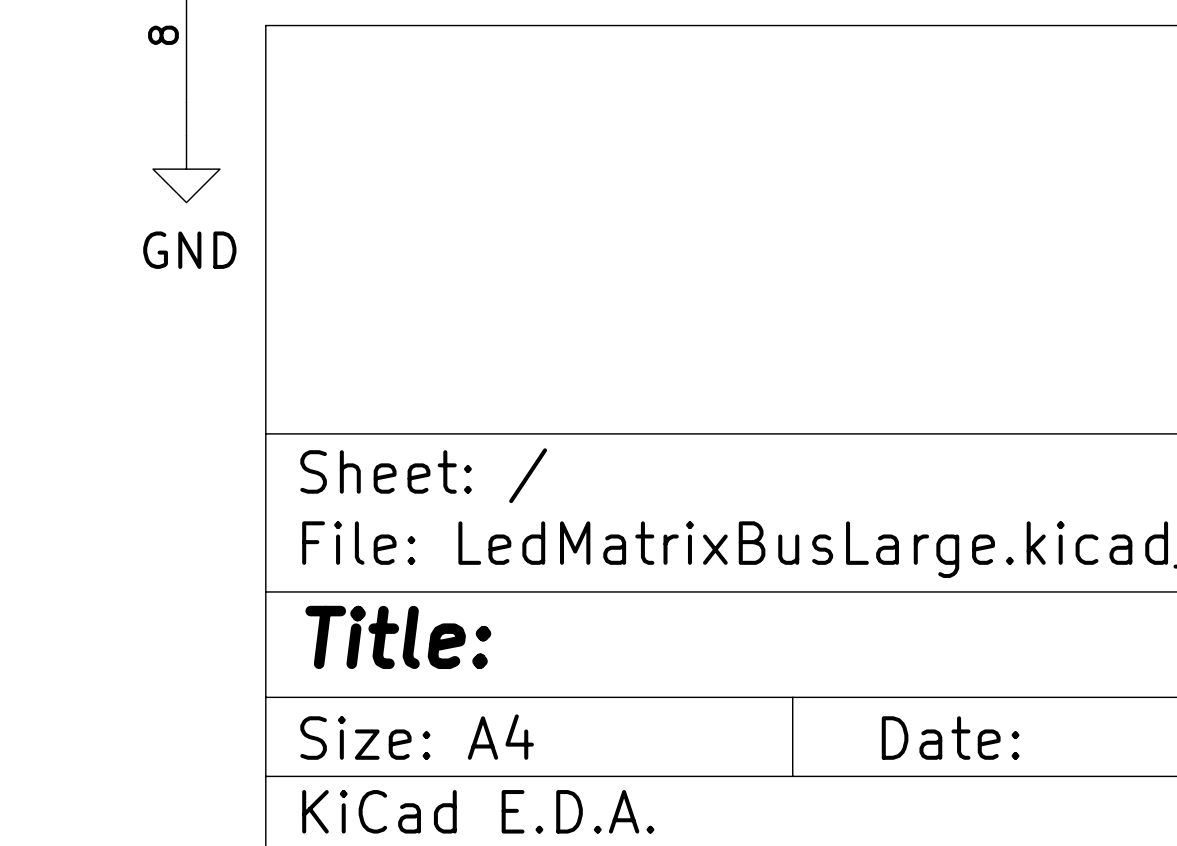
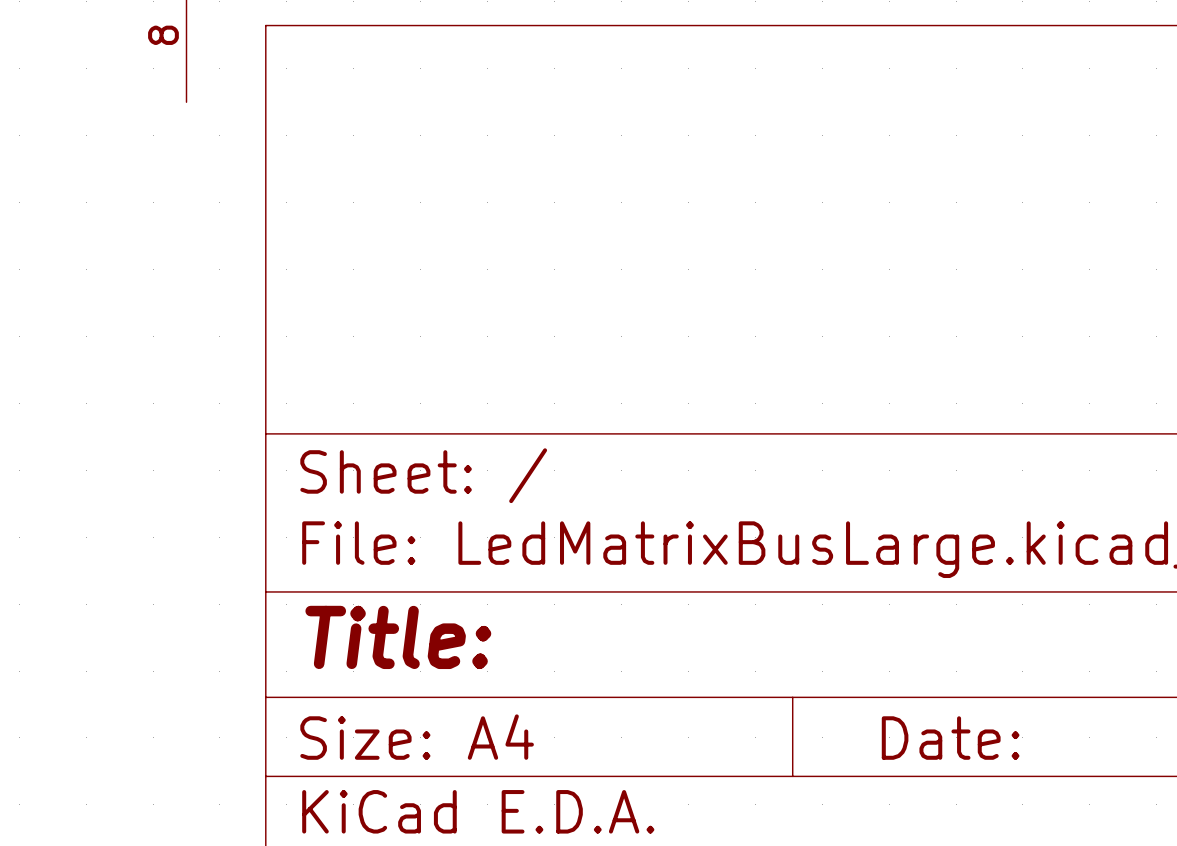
wire: (186, 102) (186, 135) -> none
power symbol: GND (186, 169) -> none

